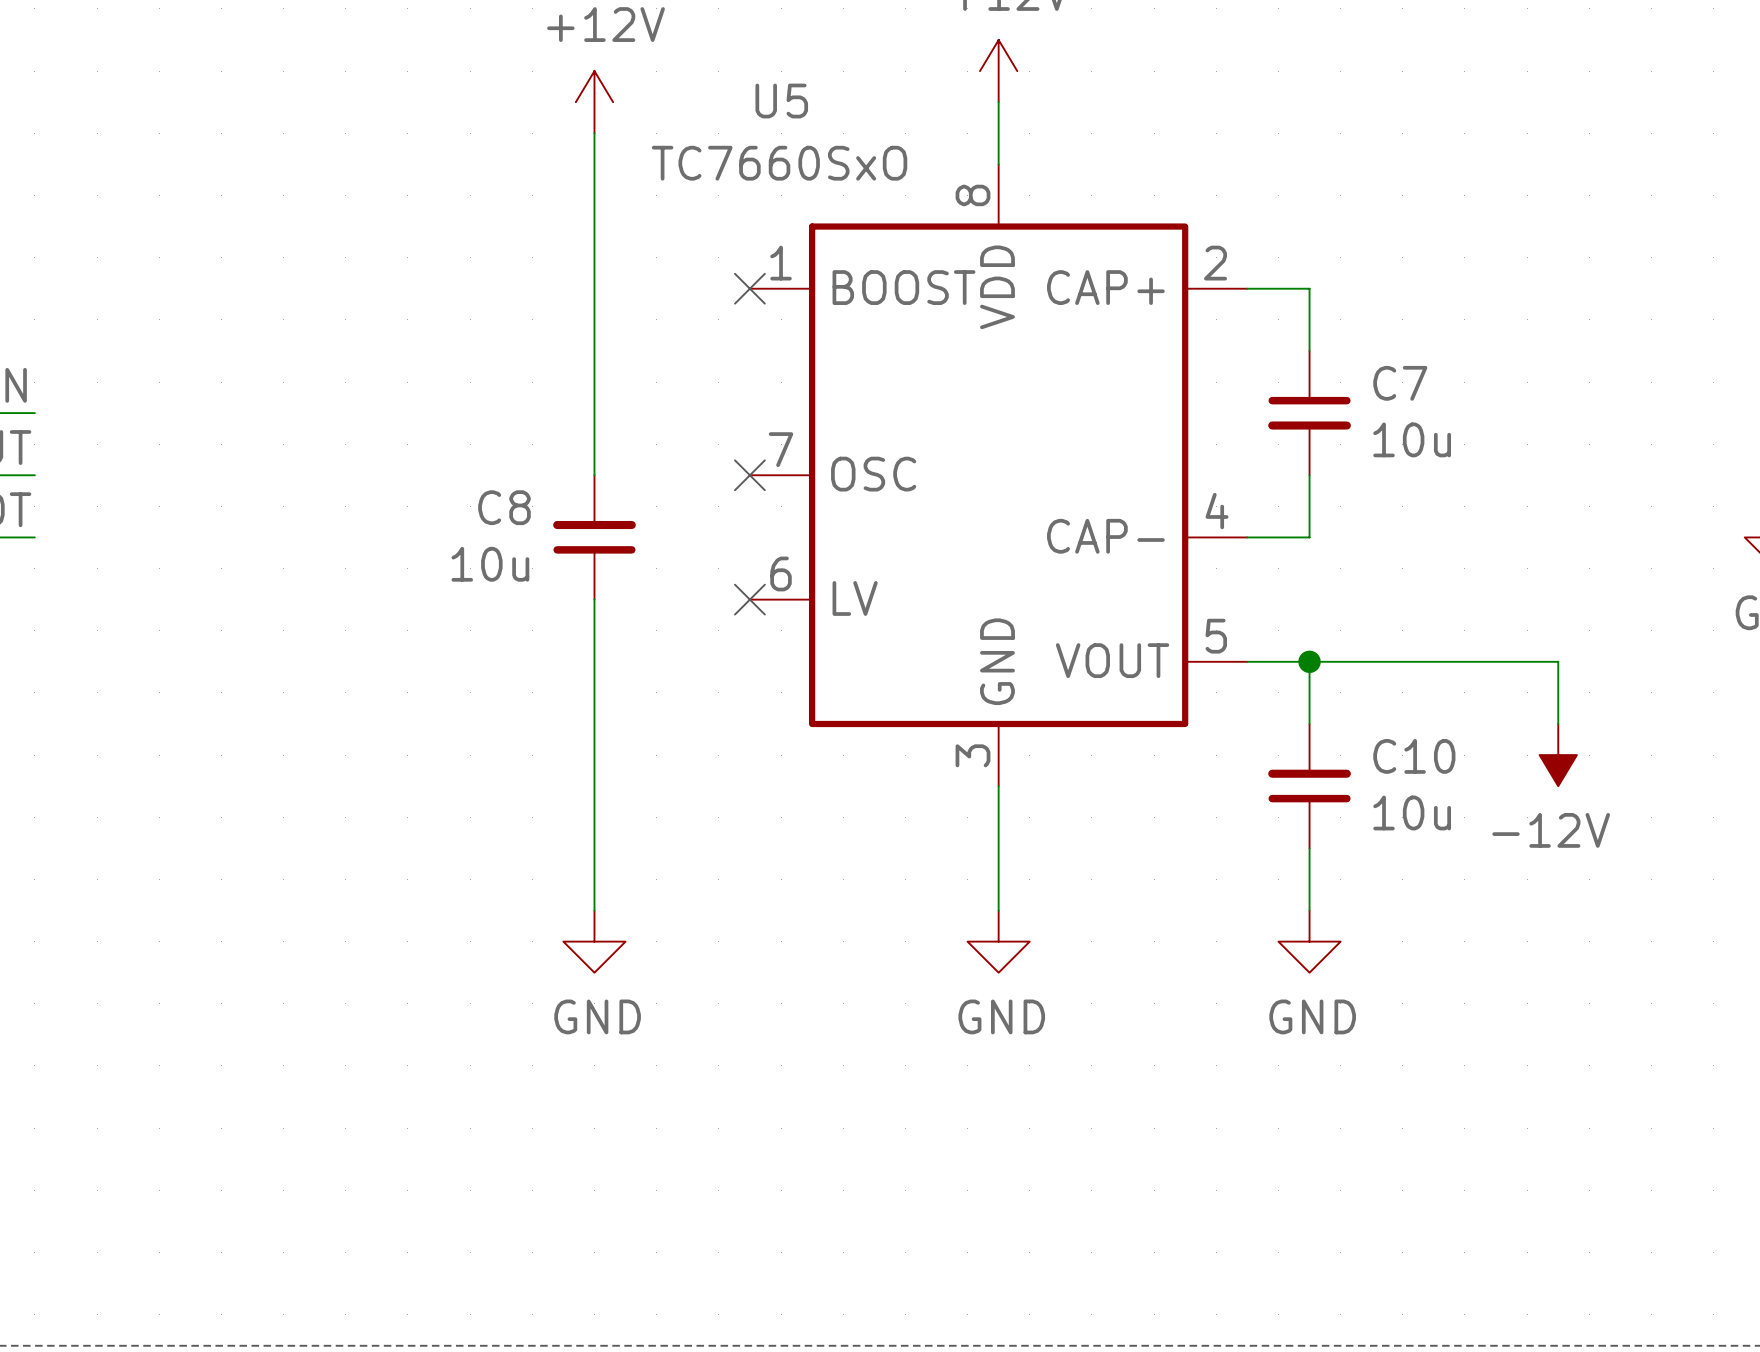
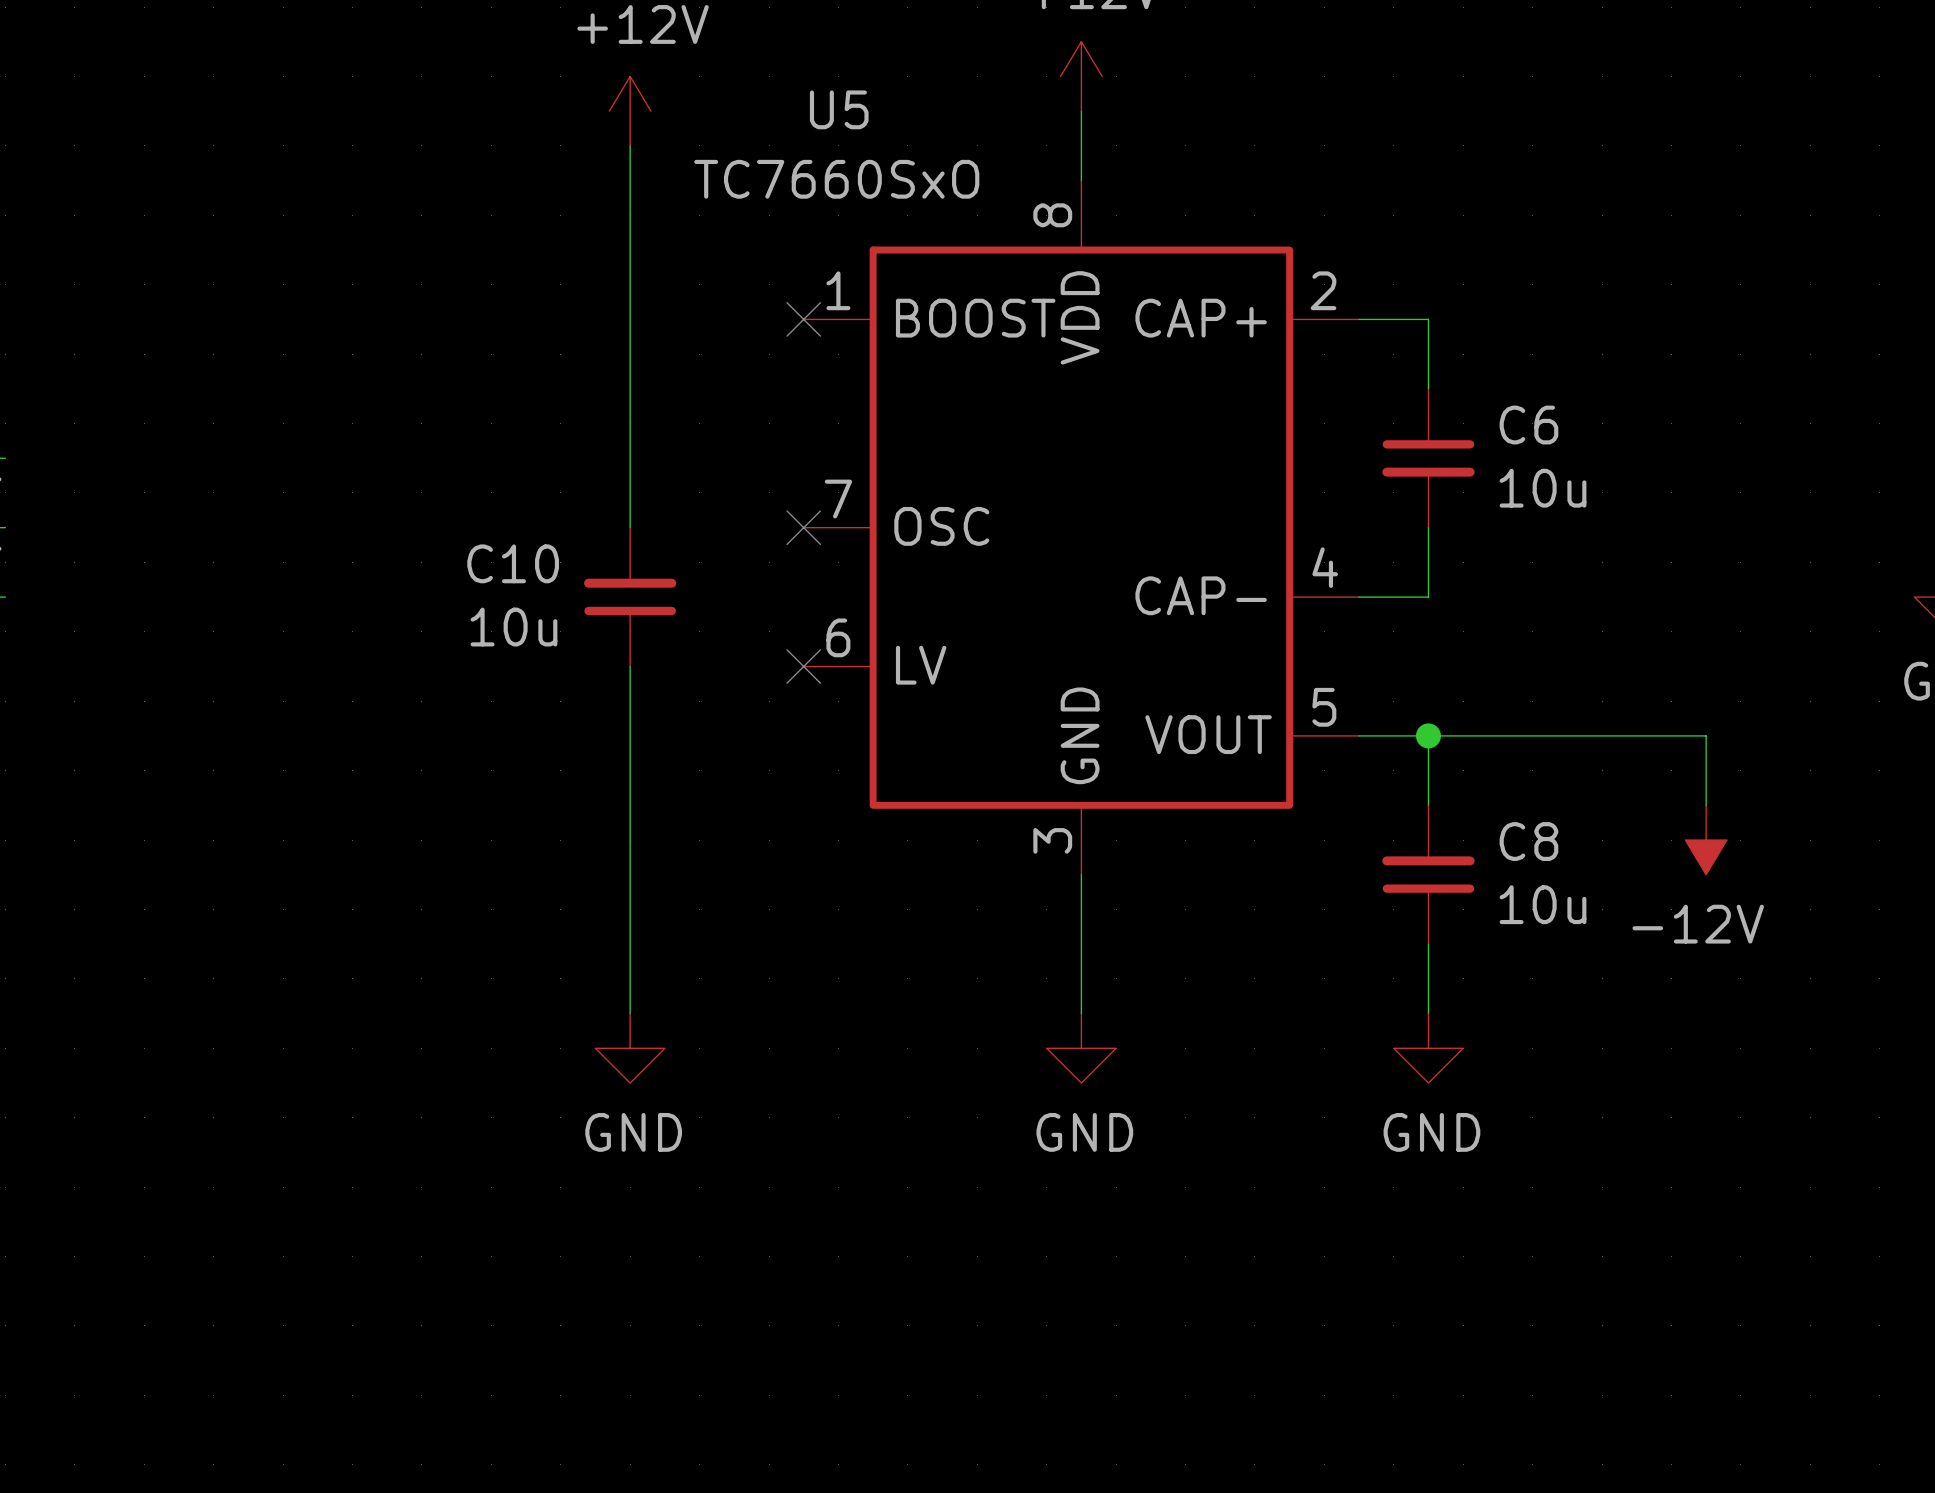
C7 name: C7 (1400, 383) -> C6 (1528, 425)
C8 name: C8 (504, 507) -> C10 (513, 563)
C10 name: C10 (1414, 756) -> C8 (1528, 841)

